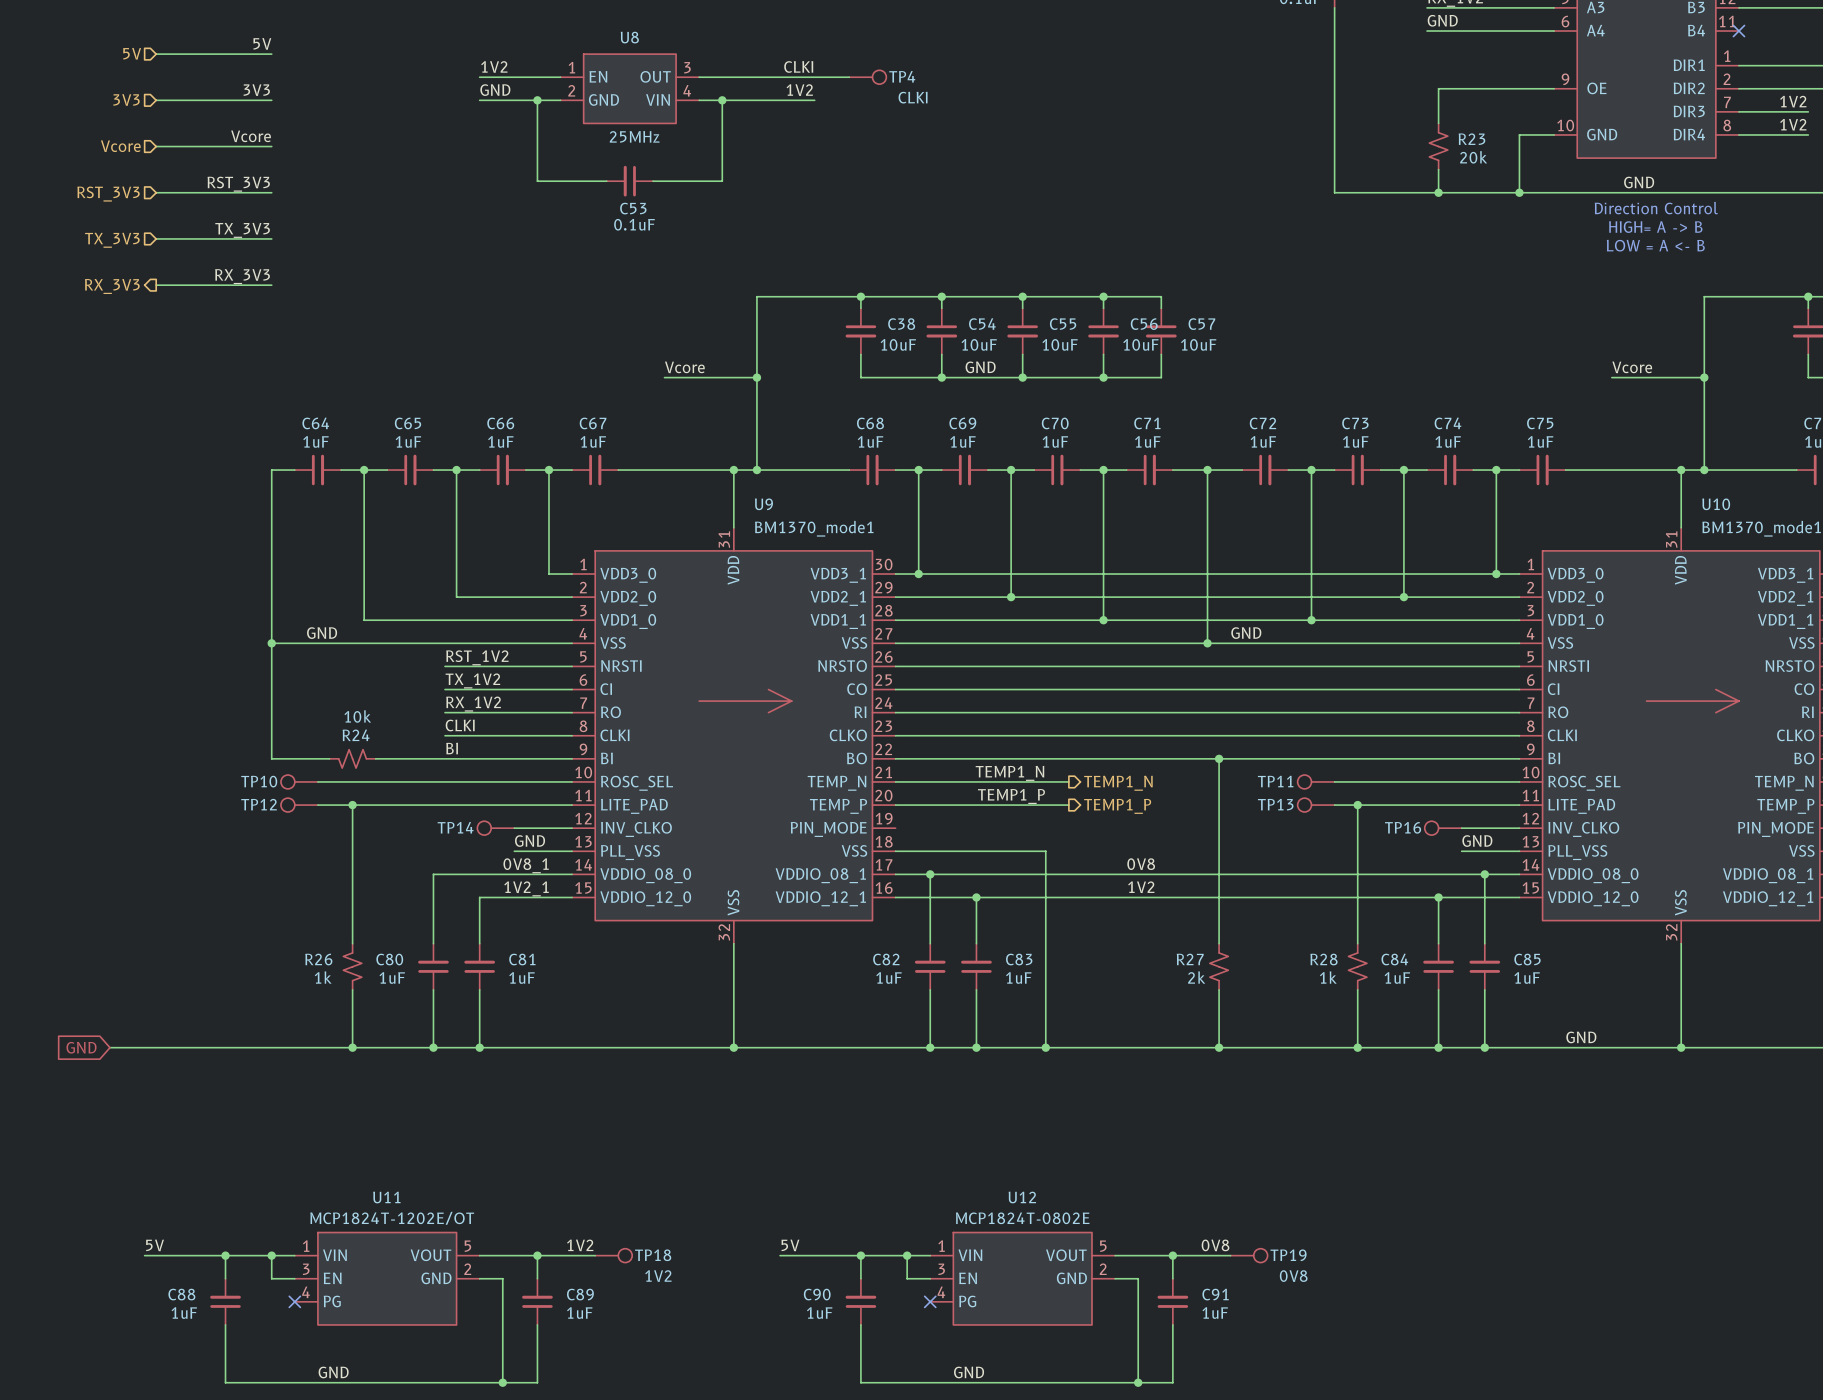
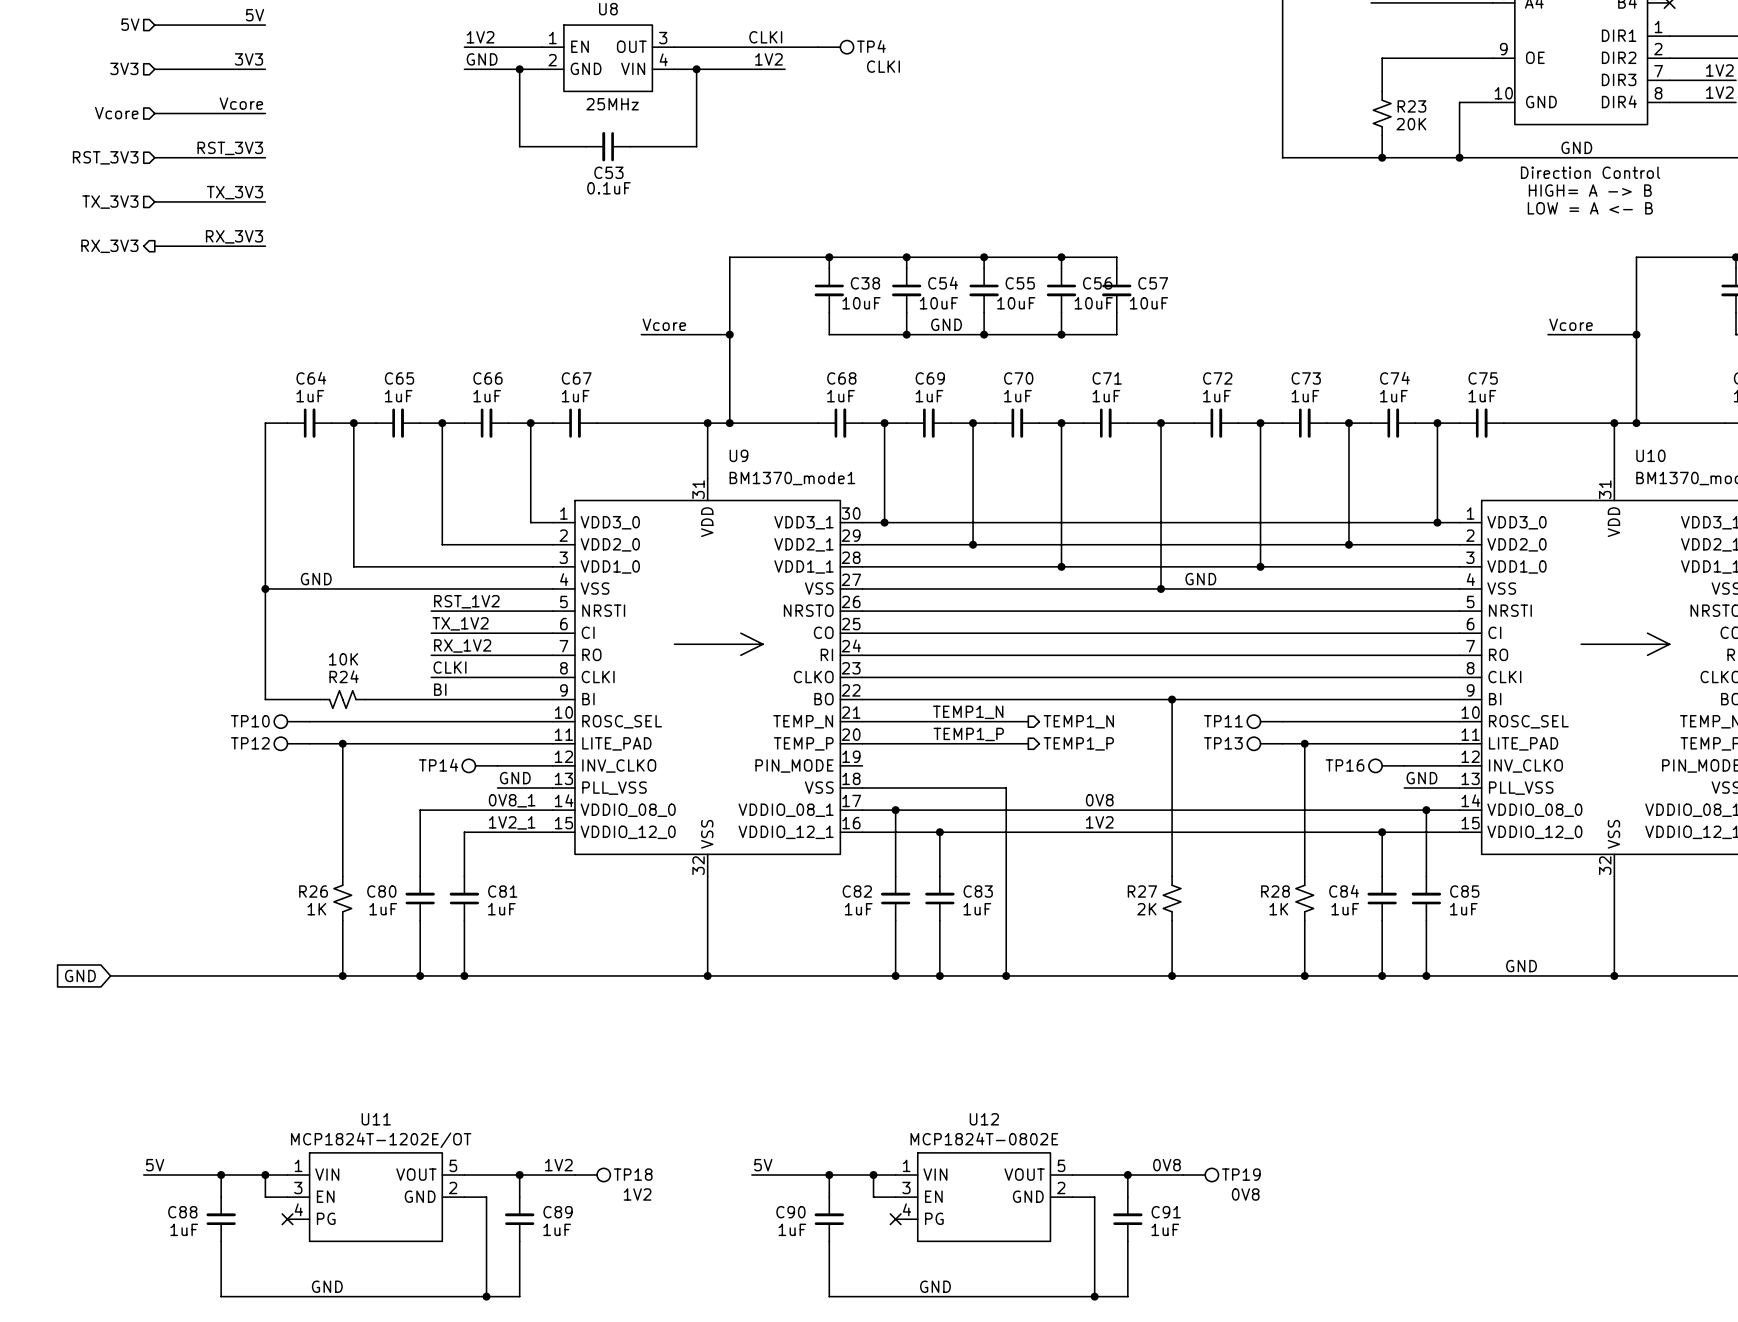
R23 value: 20k (1473, 157) -> 20K (1411, 124)
R24 value: 10k (357, 716) -> 10K (343, 659)
R26 value: 1k (323, 977) -> 1K (316, 909)
R27 value: 2k (1196, 977) -> 2K (1146, 909)
R28 value: 1k (1328, 977) -> 1K (1278, 909)

